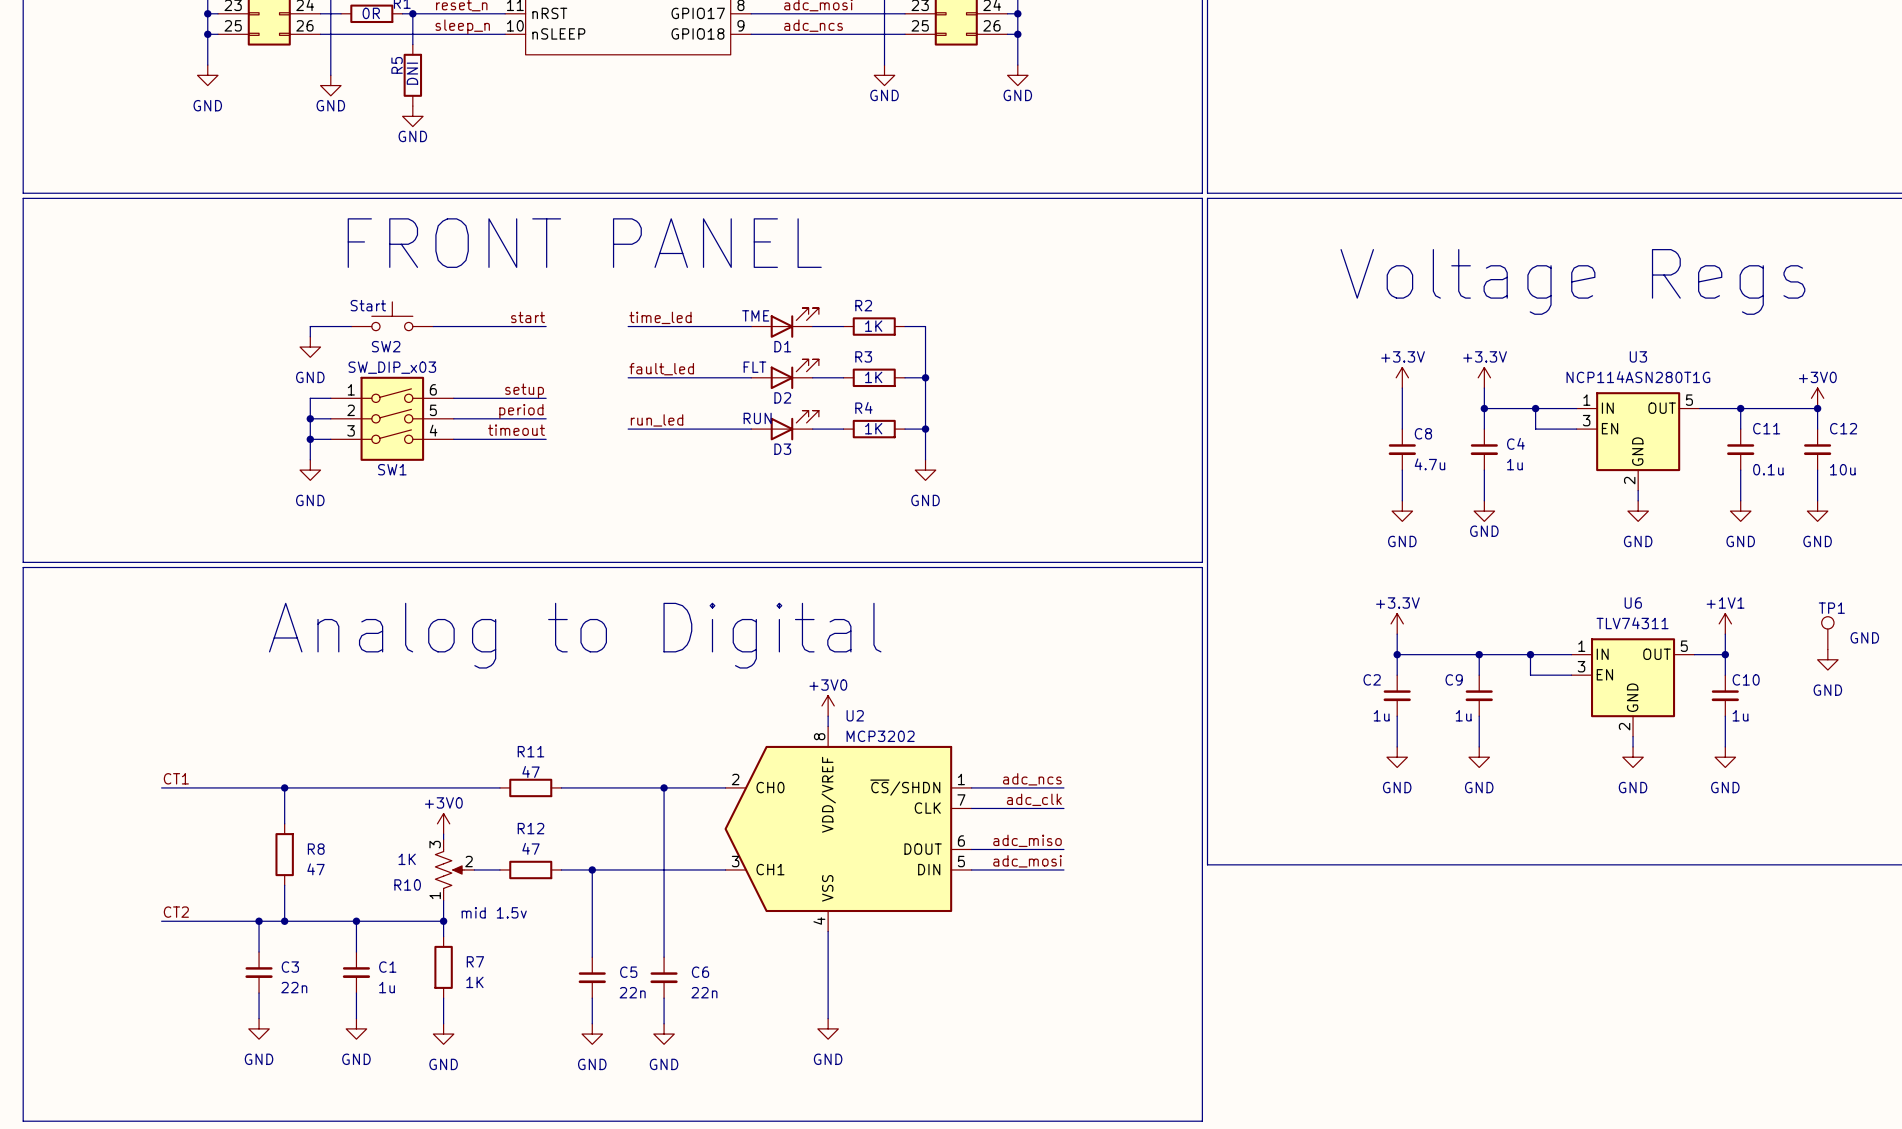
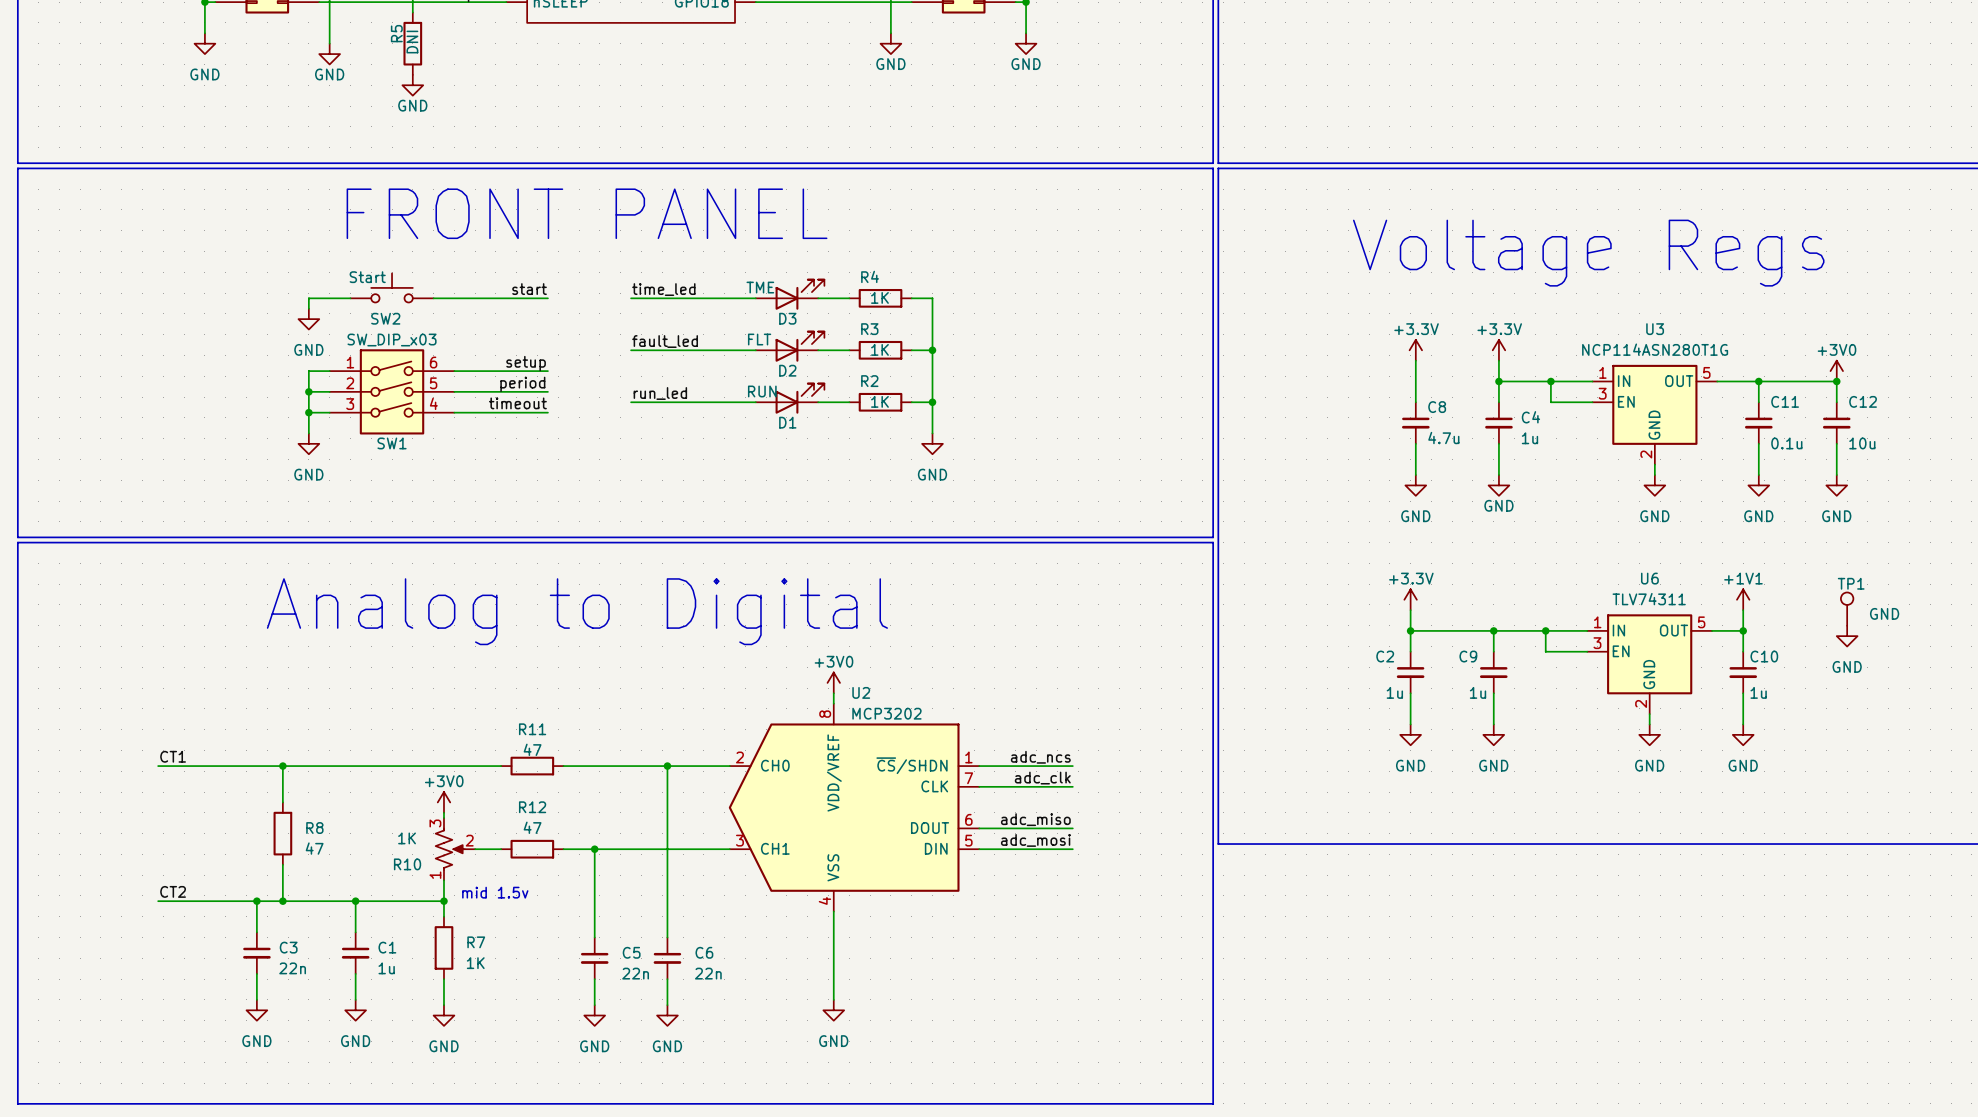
R2 name: R2 (863, 305) -> R4 (870, 276)
D1 name: D1 (782, 346) -> D3 (787, 318)
R4 name: R4 (863, 407) -> R2 (869, 381)
D3 name: D3 (782, 449) -> D1 (787, 422)

